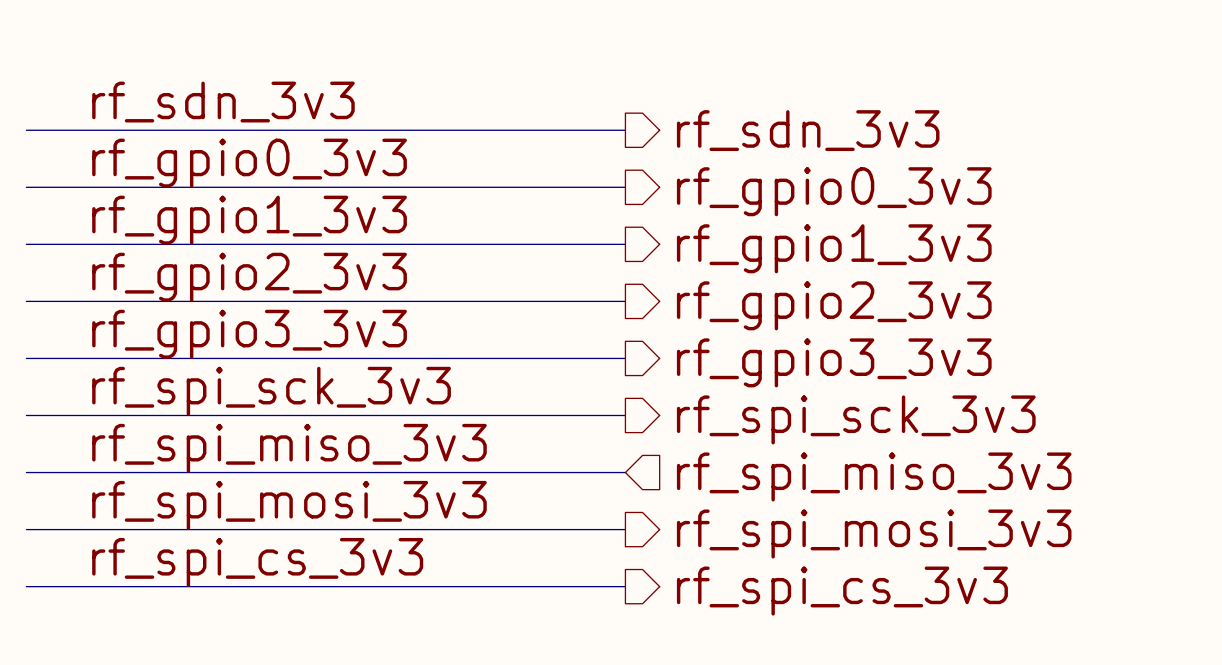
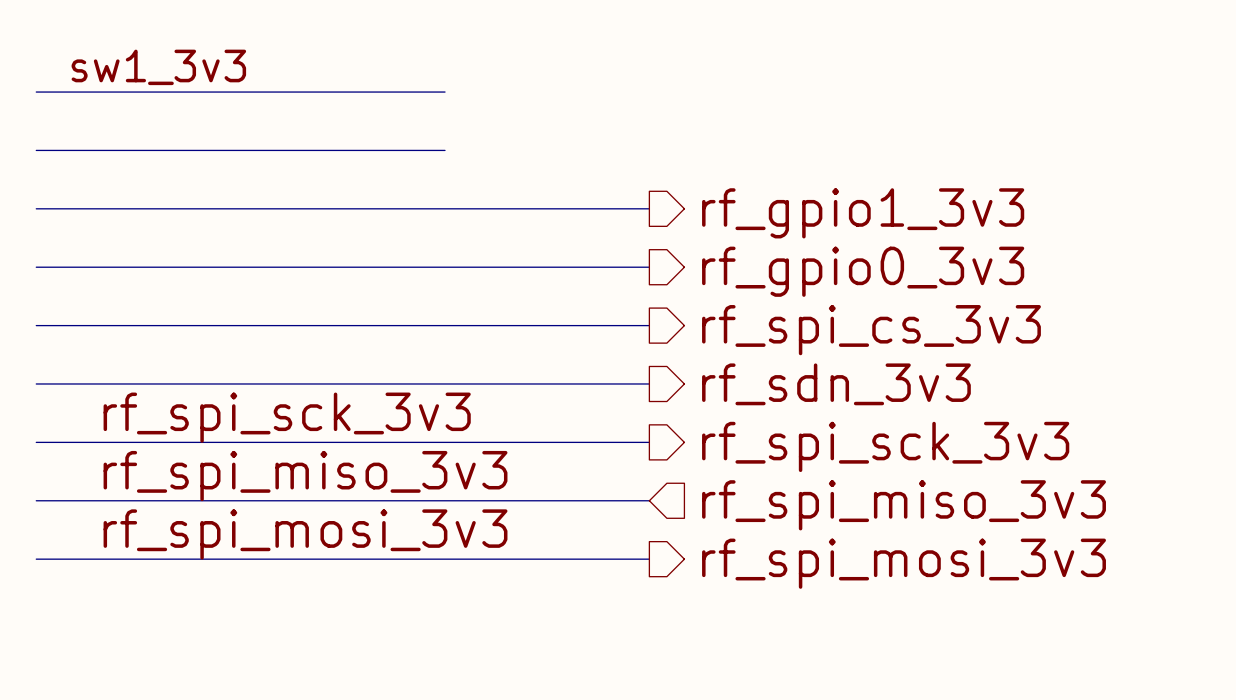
label: none -> sw1_3v3 (158, 67)
wire: none -> (36, 92) (445, 92)
label: rf_sdn_3v3 (223, 102) -> none
wire: (425, 130) (625, 130) -> none
hierarchical label: rf_sdn_3v3 (808, 130) -> none
label: rf_gpio0_3v3 (249, 163) -> none
hierarchical label: rf_gpio0_3v3 (834, 191) -> rf_gpio1_3v3 (863, 213)
label: rf_gpio1_3v3 (249, 220) -> none
hierarchical label: rf_gpio1_3v3 (834, 248) -> rf_gpio0_3v3 (863, 271)
label: rf_gpio2_3v3 (249, 277) -> none
hierarchical label: rf_gpio2_3v3 (834, 305) -> rf_spi_cs_3v3 (871, 330)
label: rf_gpio3_3v3 (249, 334) -> none
hierarchical label: rf_gpio3_3v3 (834, 362) -> rf_sdn_3v3 (836, 384)
label: rf_spi_cs_3v3 (257, 562) -> none
wire: (26, 586) (625, 586) -> none
hierarchical label: rf_spi_cs_3v3 (842, 591) -> none

